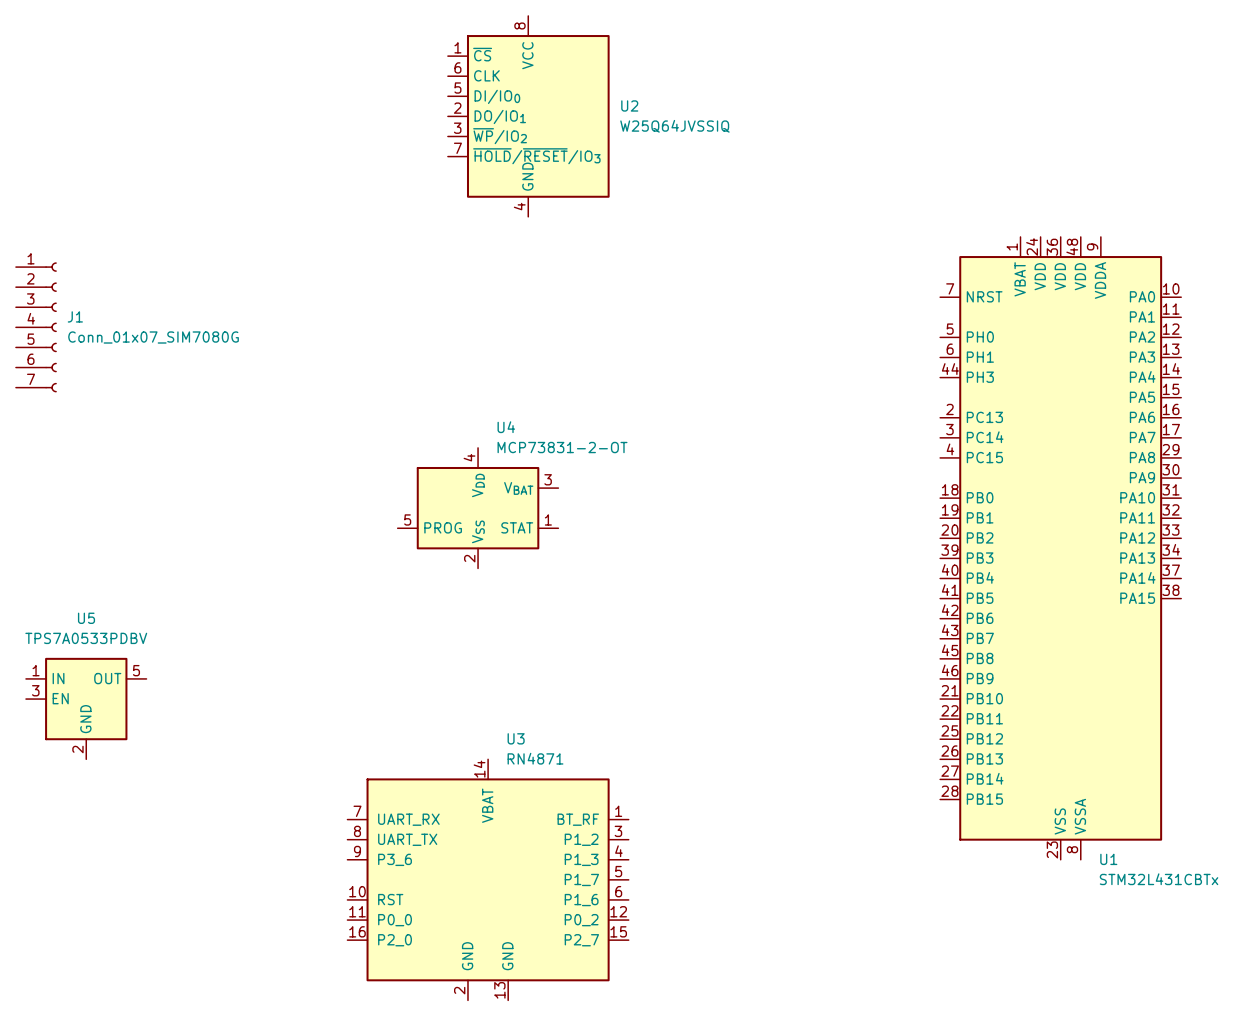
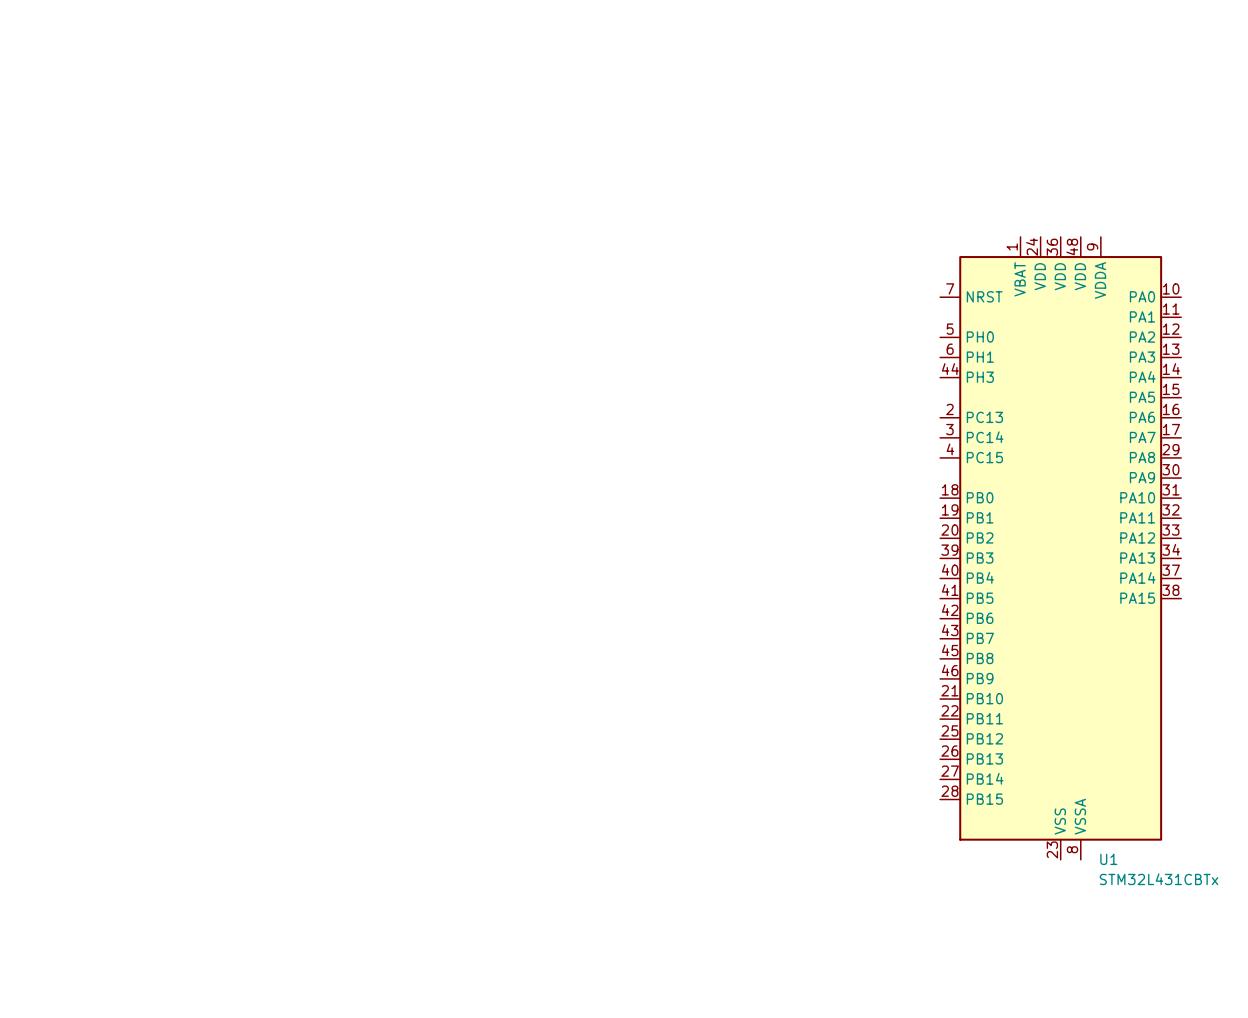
U2: W25Q64JVSSIQ (528, 116) -> none
J1: Conn_01x07_SIM7080G (36, 327) -> none
U4: MCP73831-2-OT (478, 508) -> none
U5: TPS7A0533PDBV (86, 708) -> none
U3: RN4871 (488, 879) -> none

